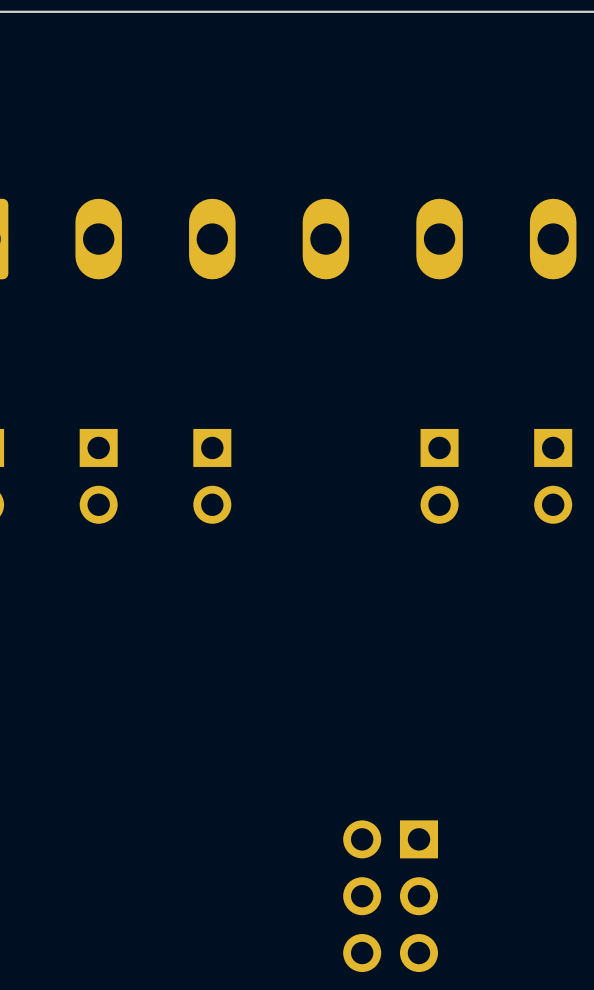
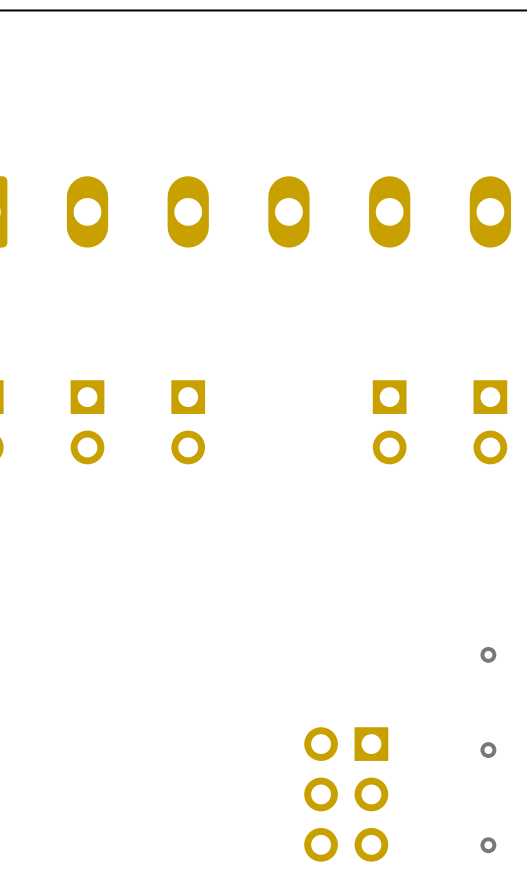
via: none -> (488, 654)
via: none -> (488, 750)
via: none -> (488, 845)

